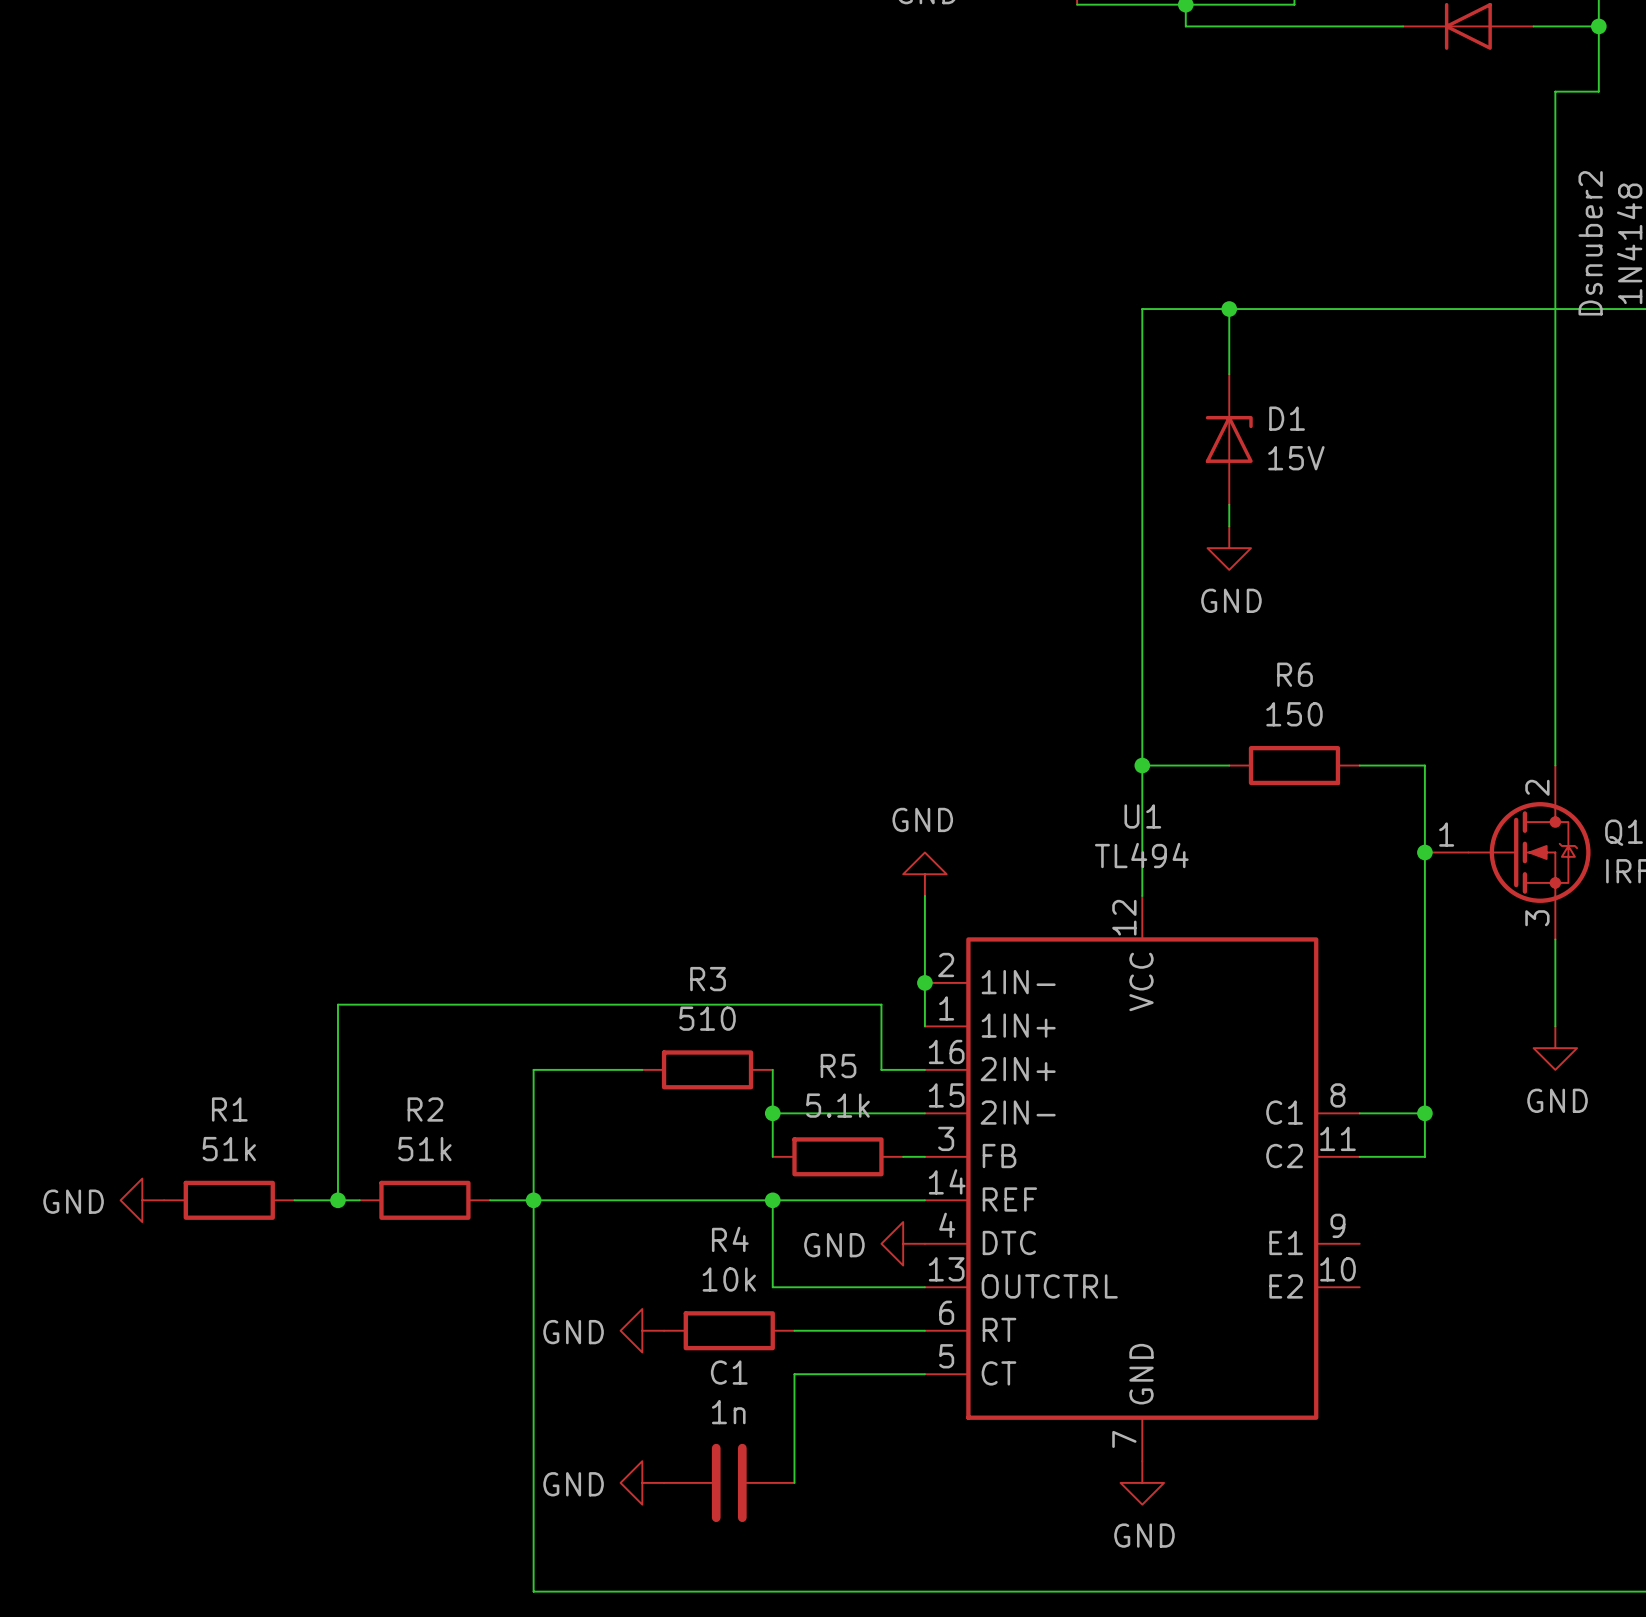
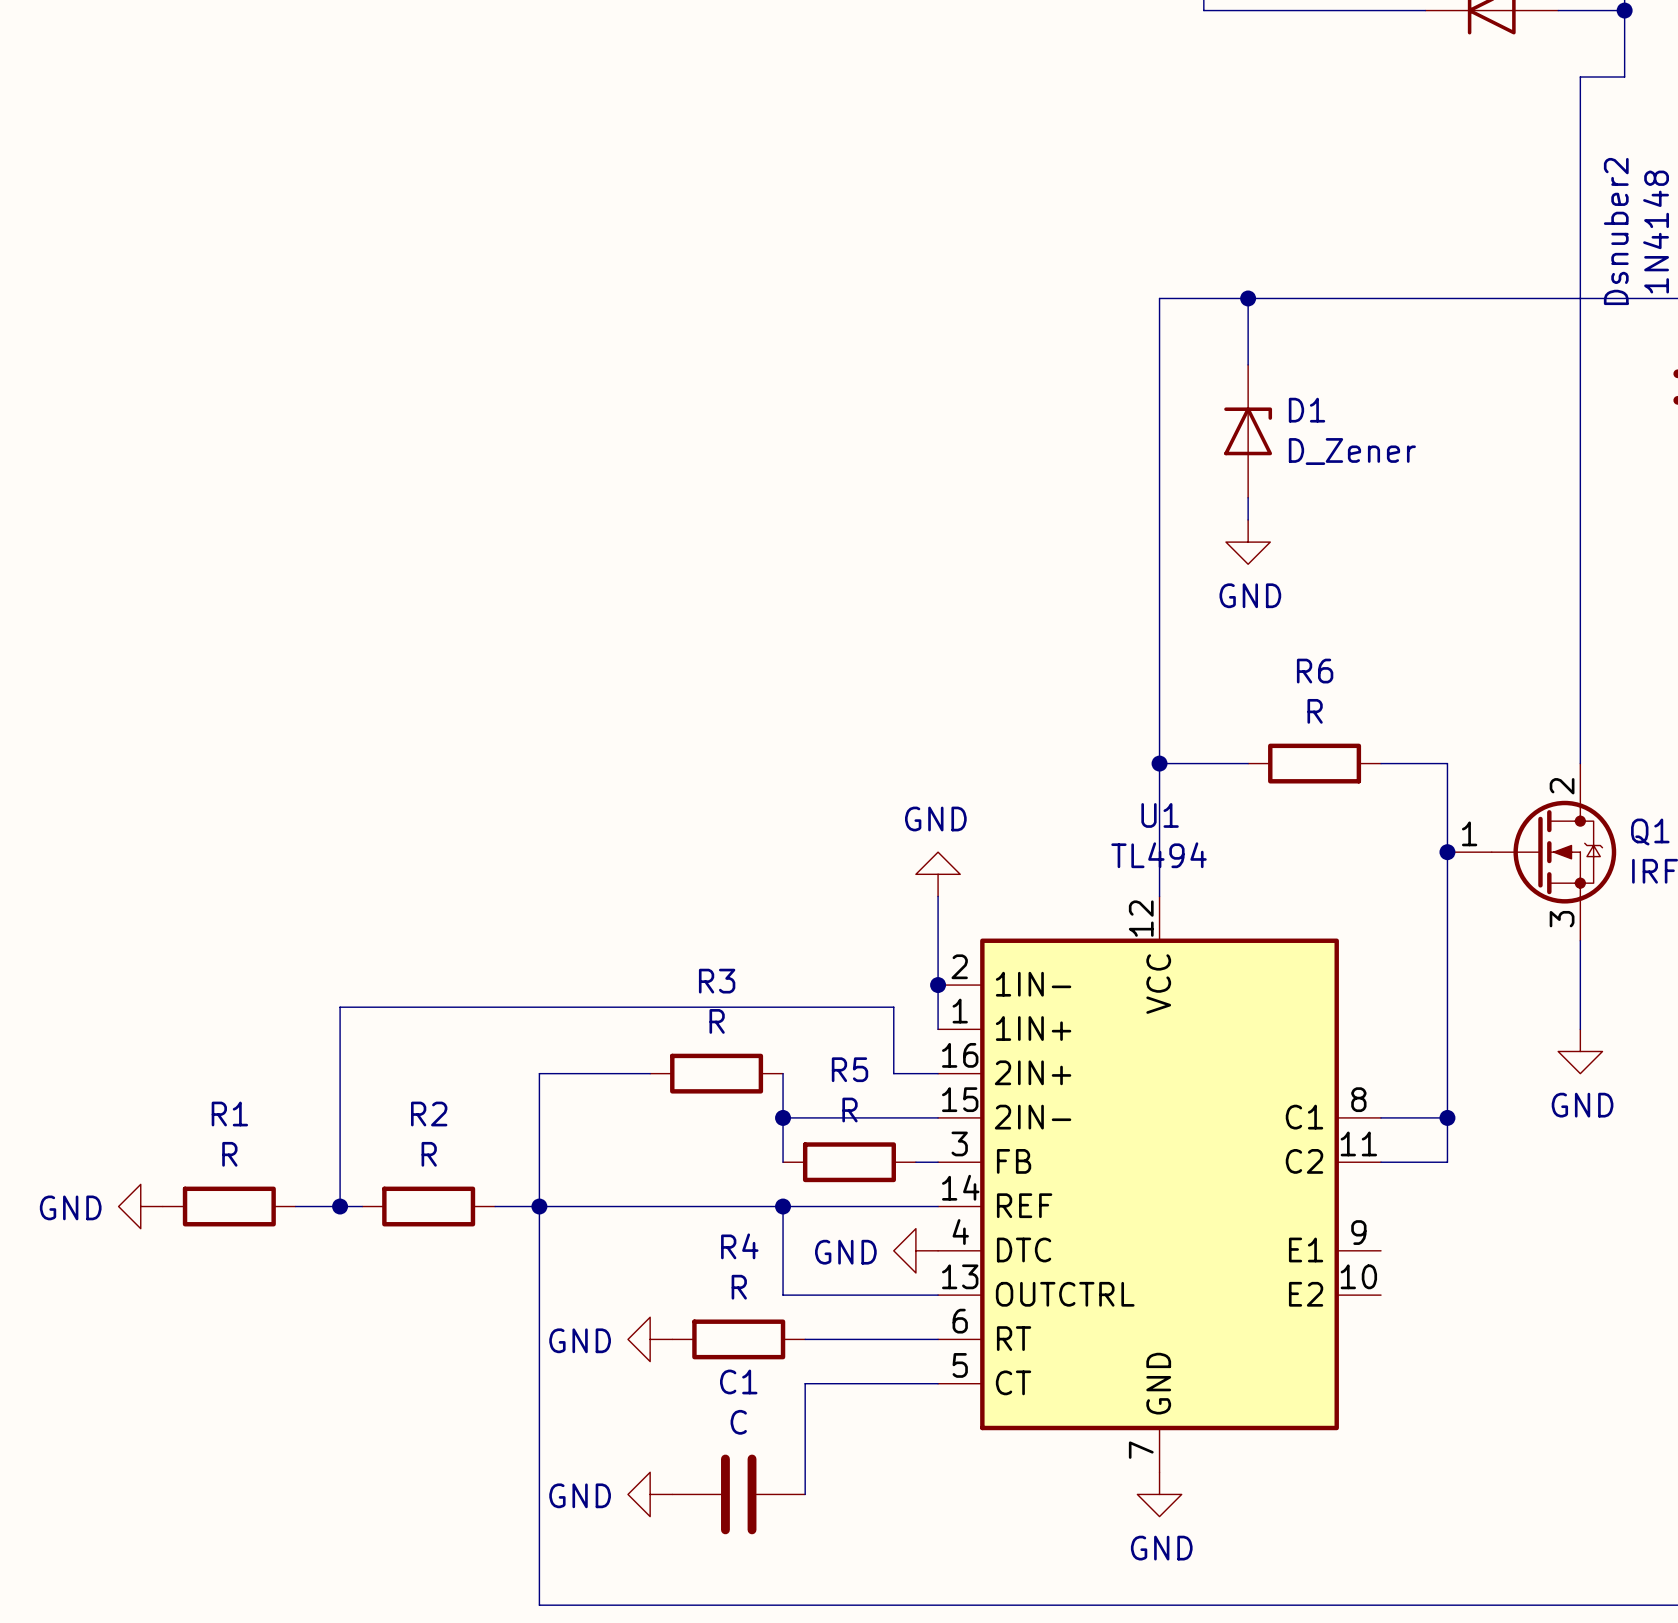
D1 value: 15V (1296, 458) -> D_Zener (1352, 451)
R6 value: 150 (1294, 714) -> R (1315, 711)
R3 value: 510 (707, 1018) -> R (717, 1021)
R5 value: 5.1k (837, 1105) -> R (850, 1110)
R1 value: 51k (229, 1149) -> R (229, 1154)
R2 value: 51k (424, 1149) -> R (429, 1154)
R4 value: 10k (729, 1279) -> R (739, 1287)
C1 value: 1n (728, 1412) -> C (738, 1422)

